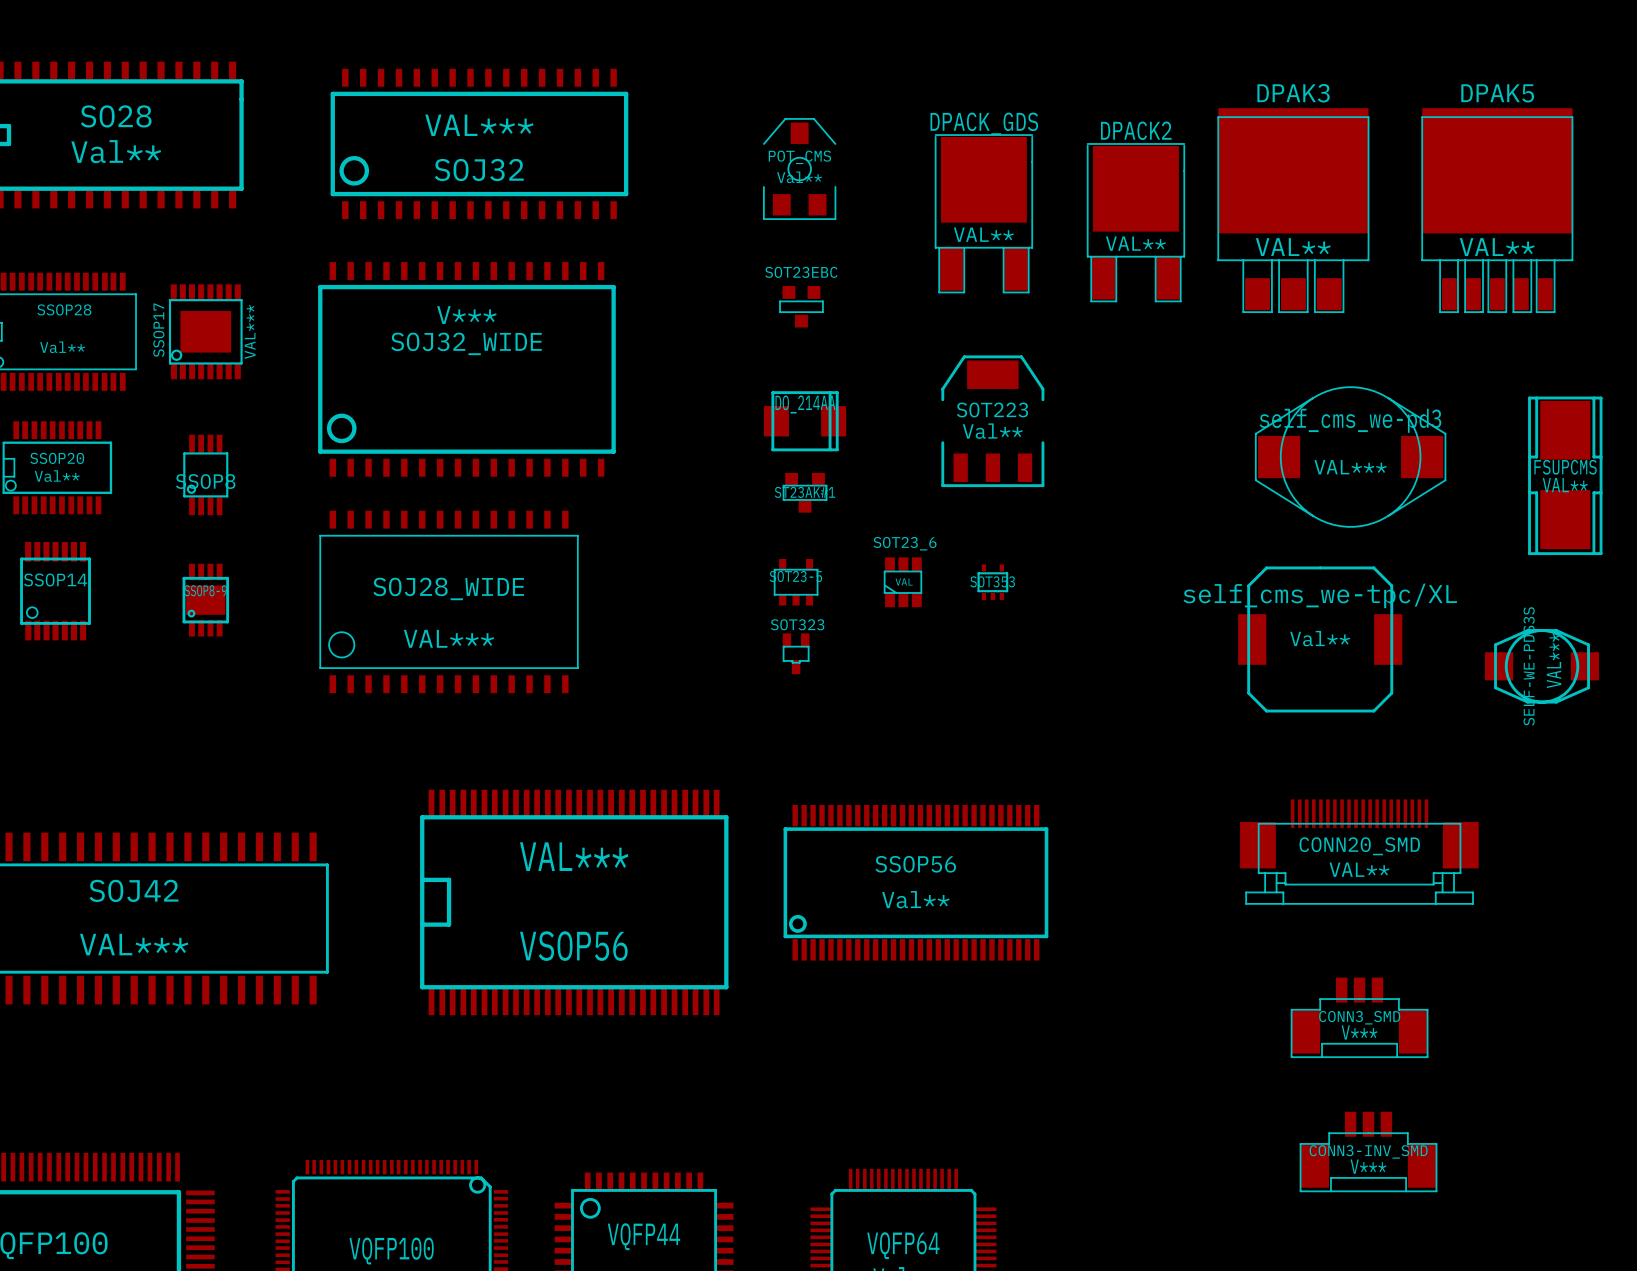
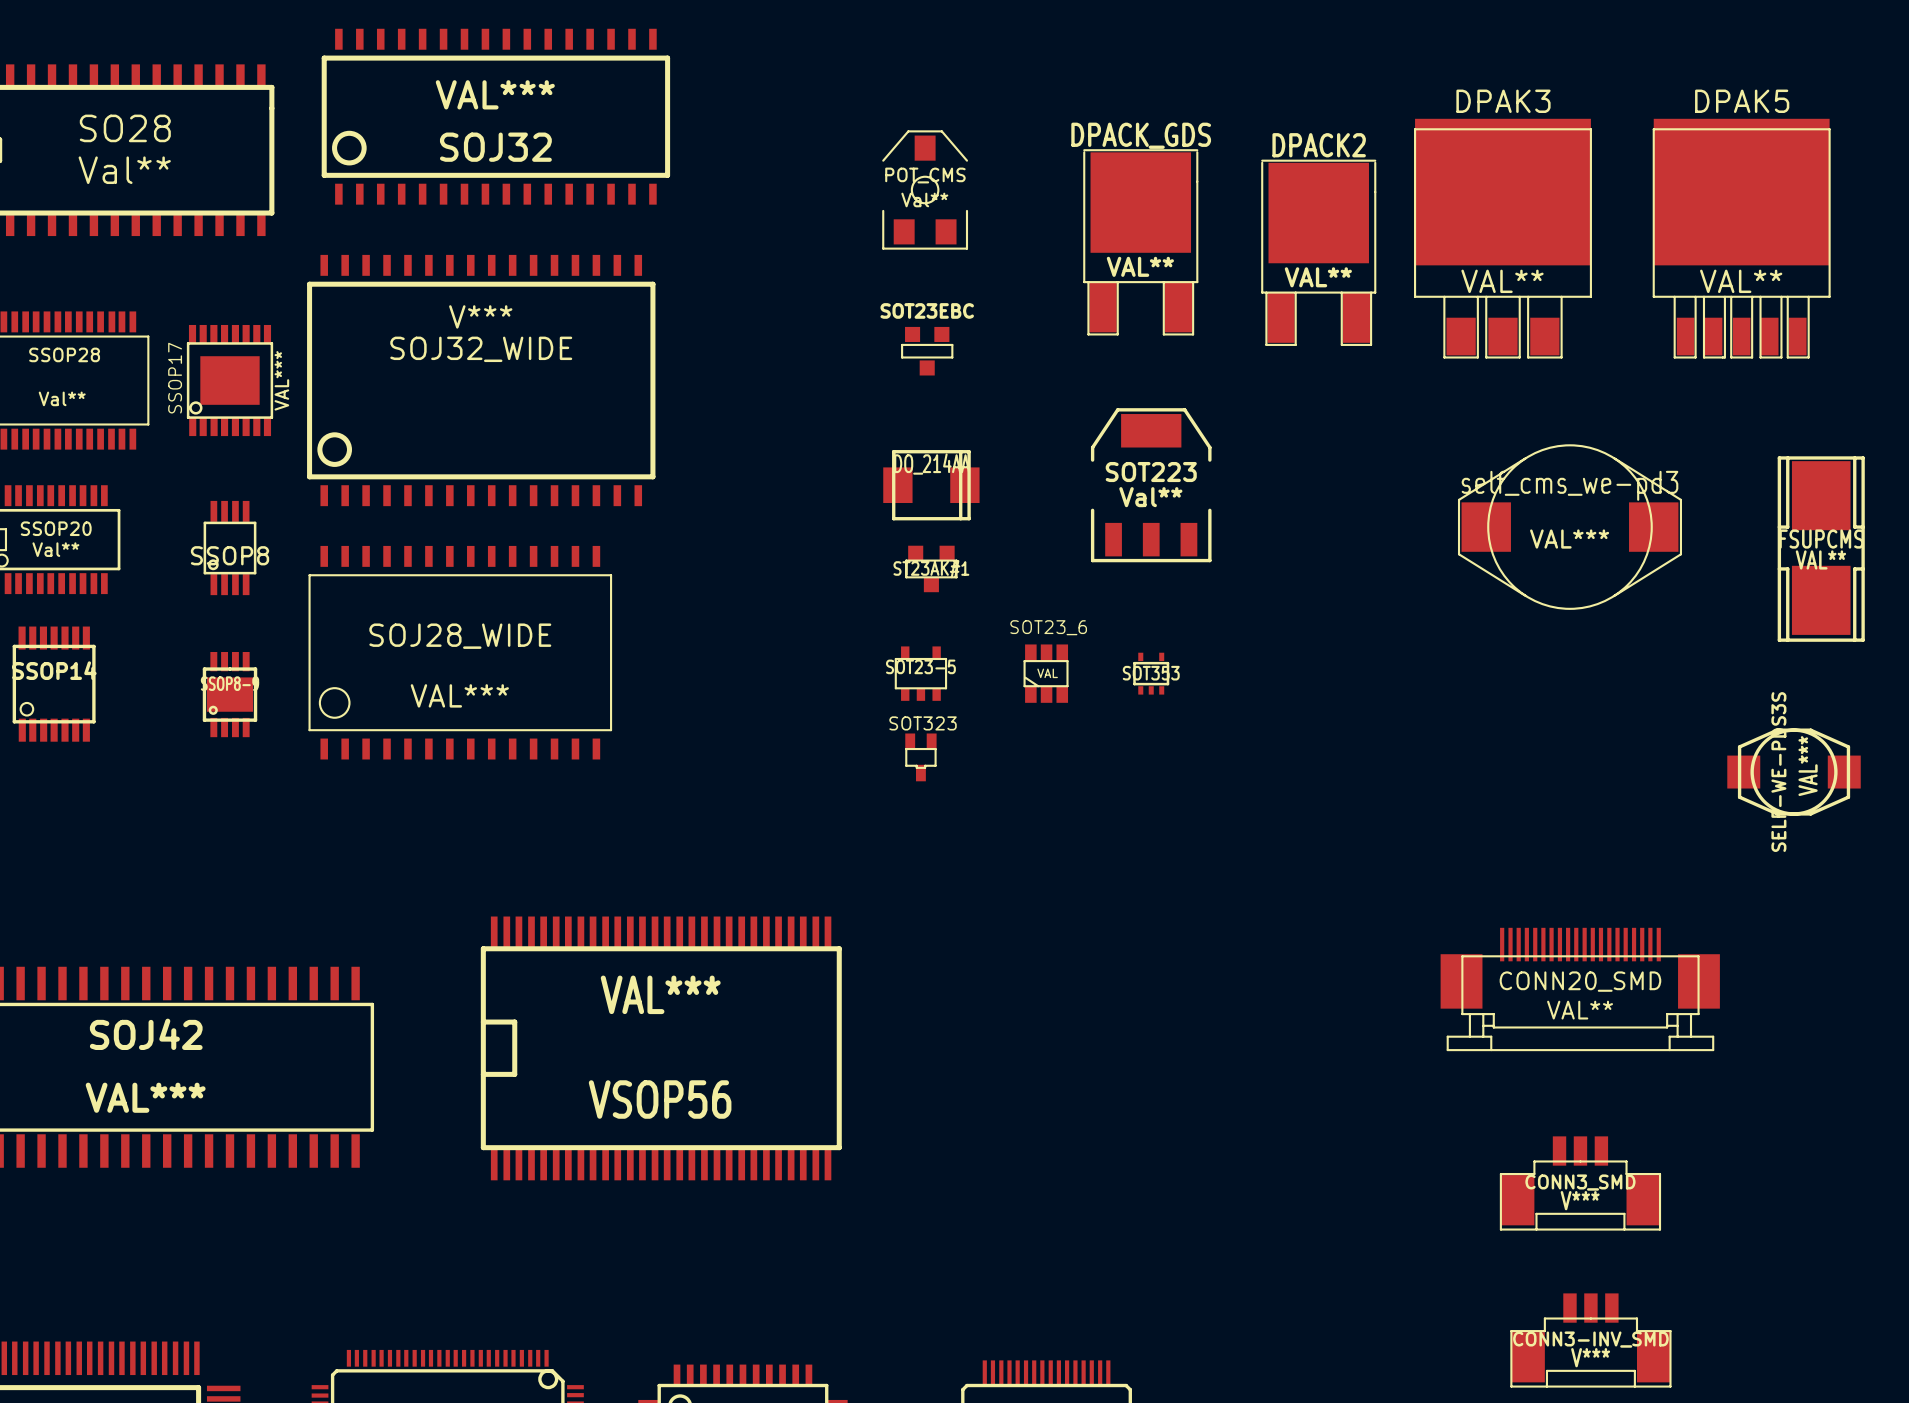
SOJ32 position: (479, 143) -> (495, 116)
SOJ32_WIDE position: (466, 369) -> (481, 380)
SOJ28_WIDE position: (449, 601) -> (460, 652)
self_cms_we-tpc/XL: Val** (1320, 639) -> none
SSOP56: Val** (915, 882) -> none

